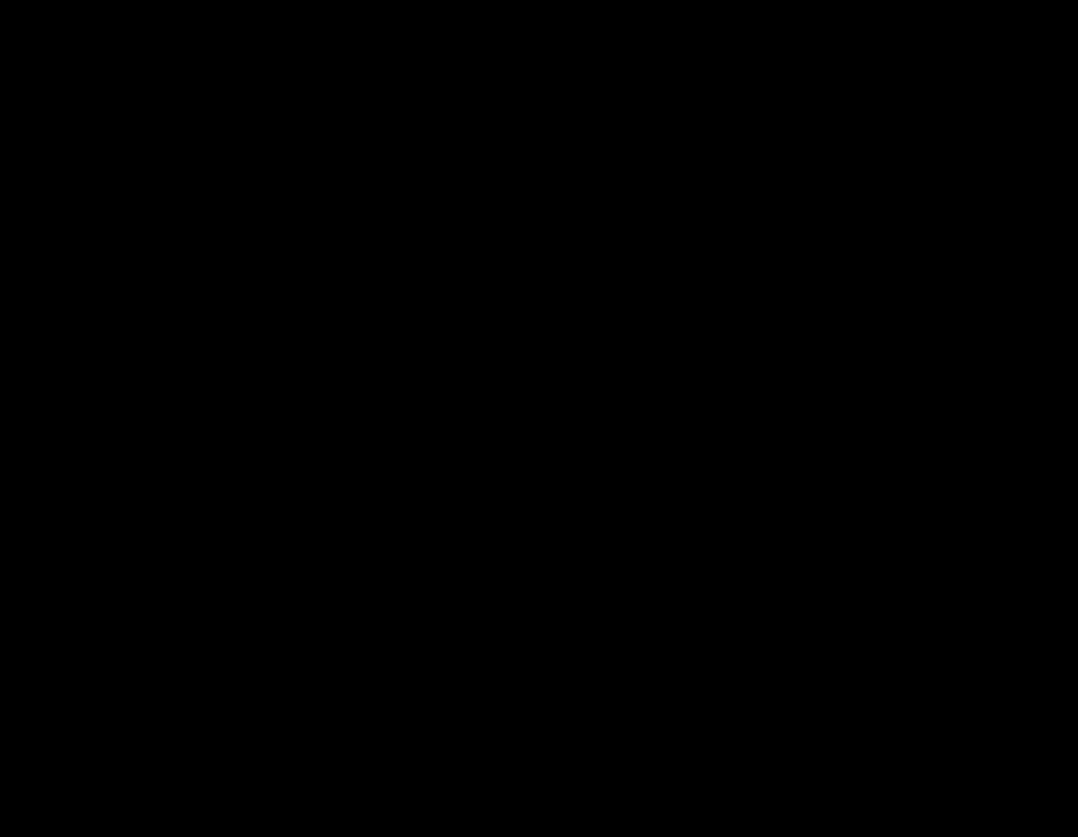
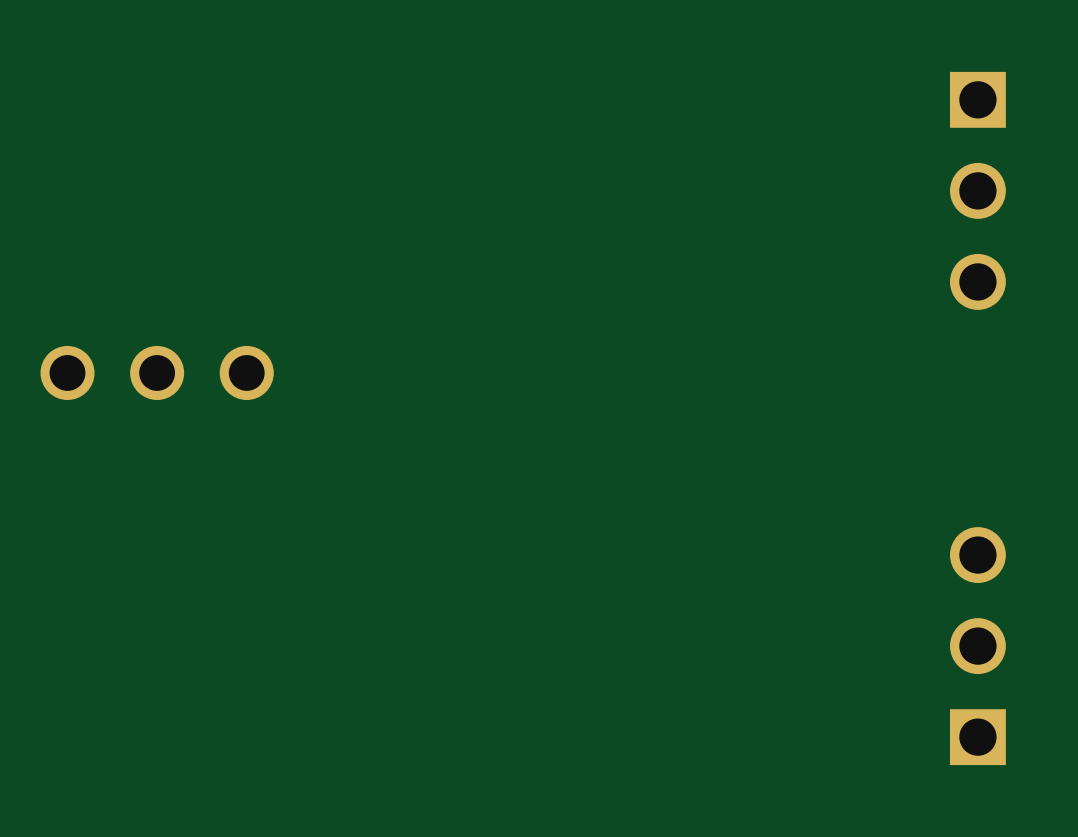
part: none -> (977, 190)
part: none -> (157, 372)
part: none -> (977, 646)

